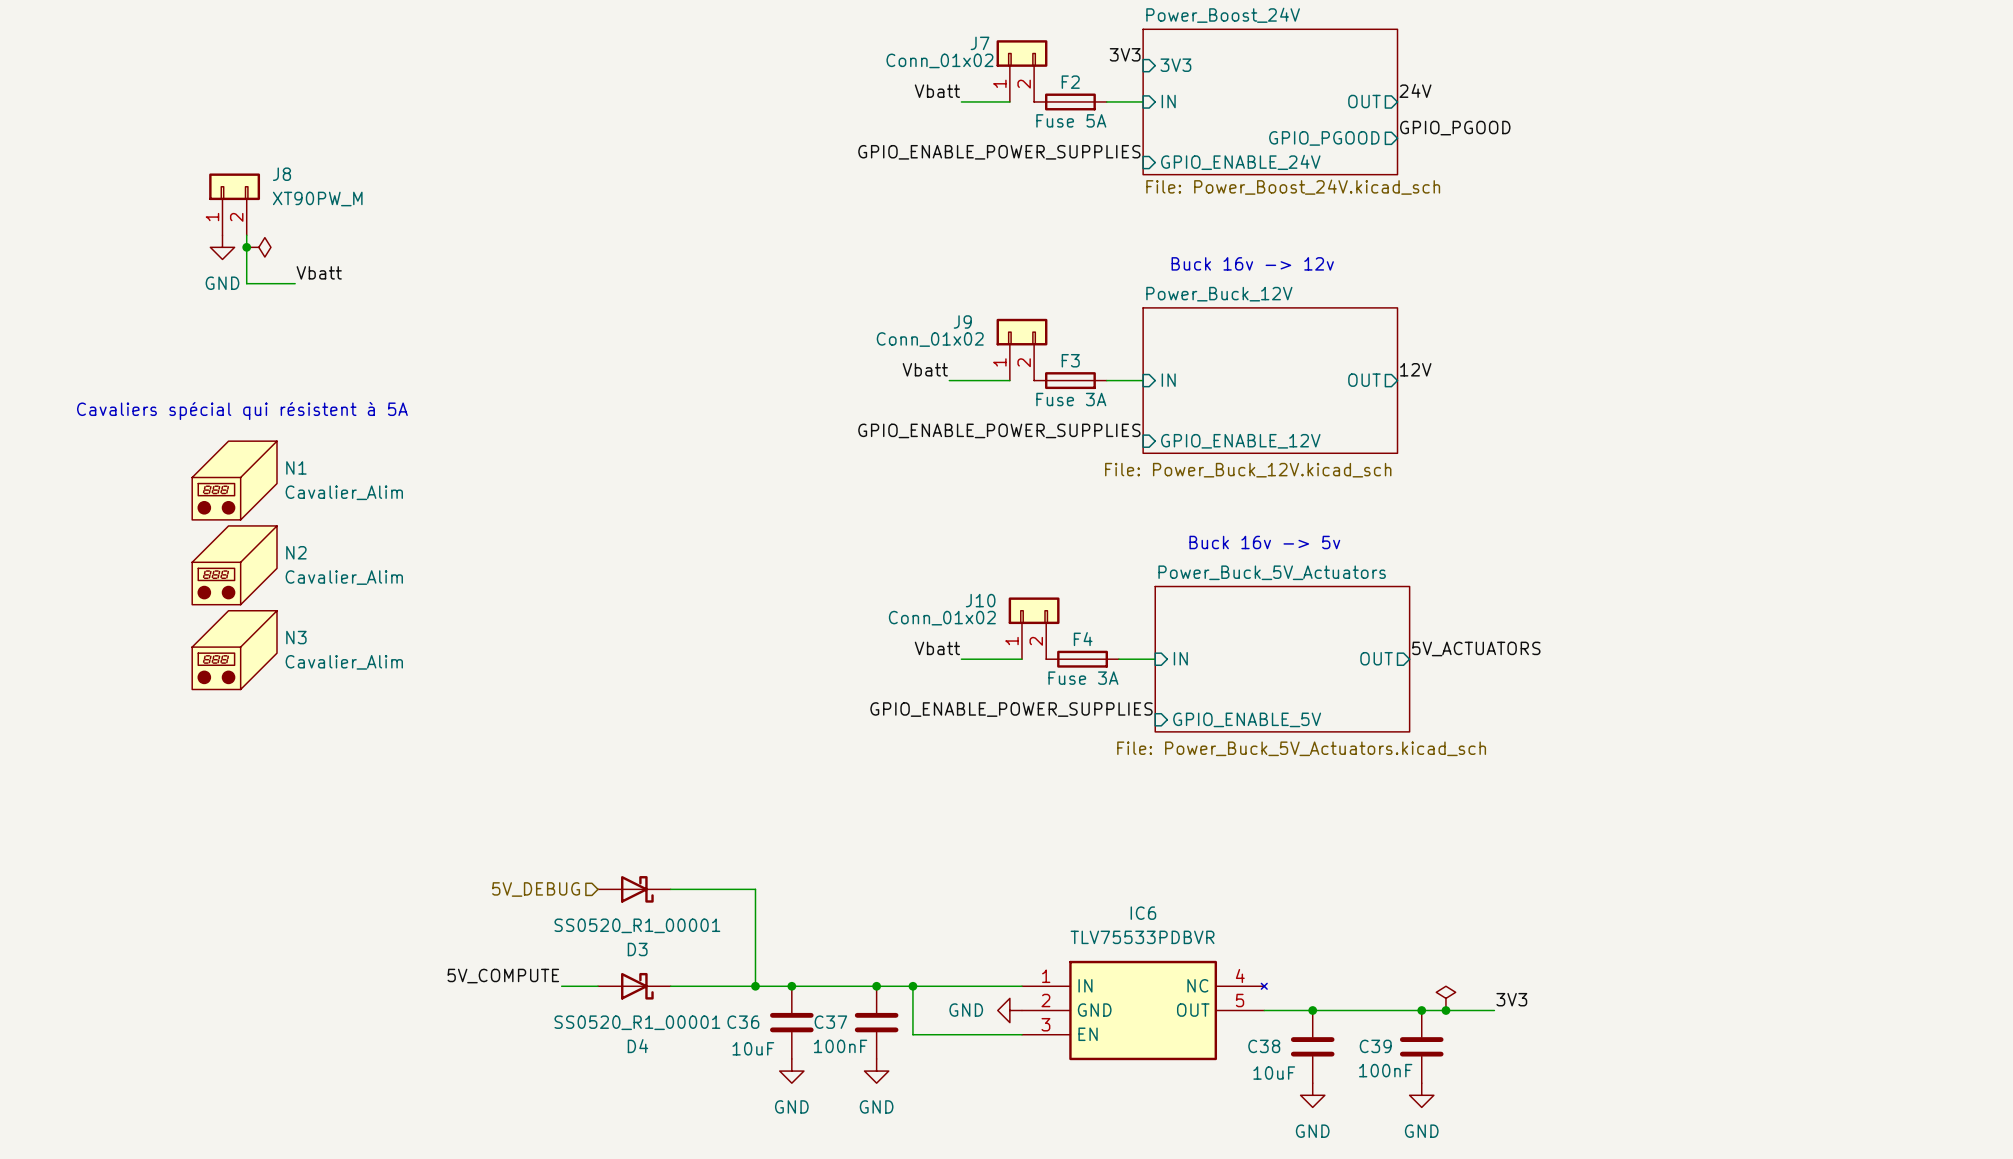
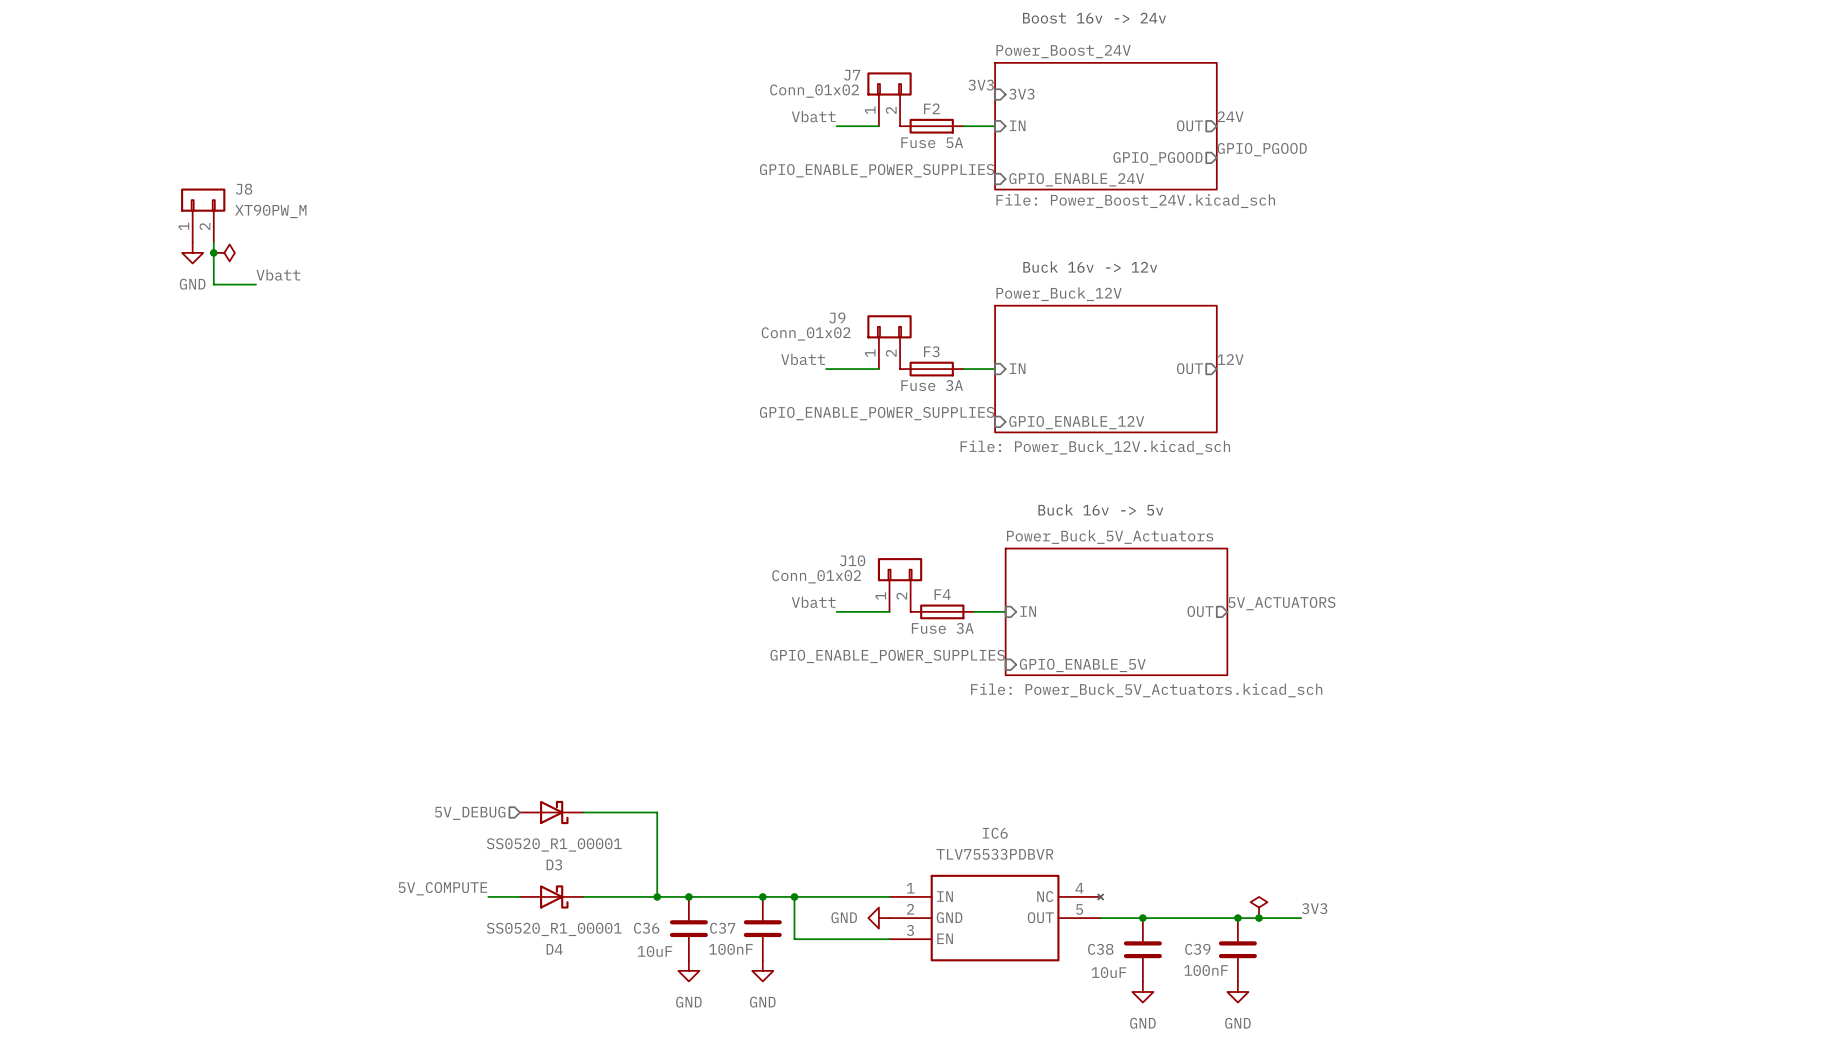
text: Cavaliers spécial qui résistent à 5A (242, 410) -> none
N1: Cavalier_Alim (234, 480) -> none
N2: Cavalier_Alim (234, 565) -> none
N3: Cavalier_Alim (234, 650) -> none

